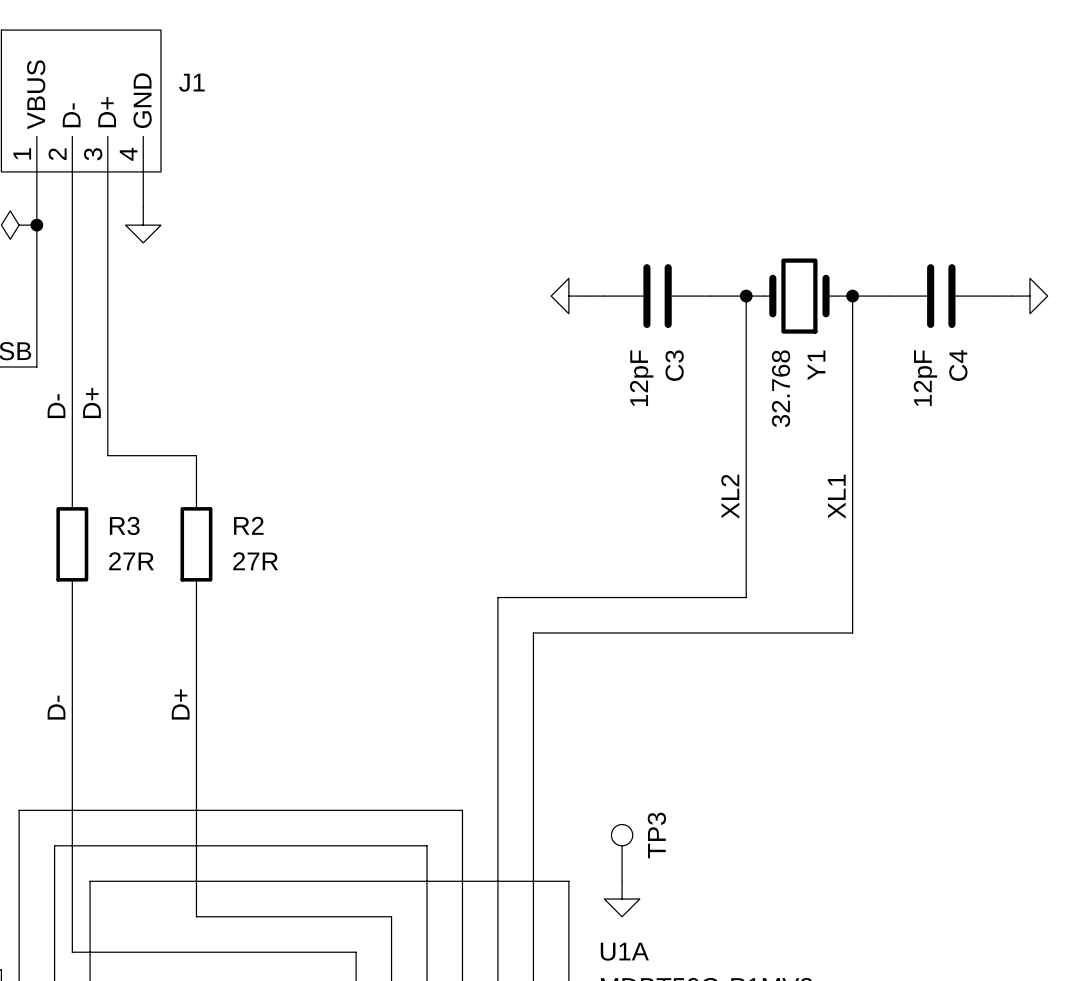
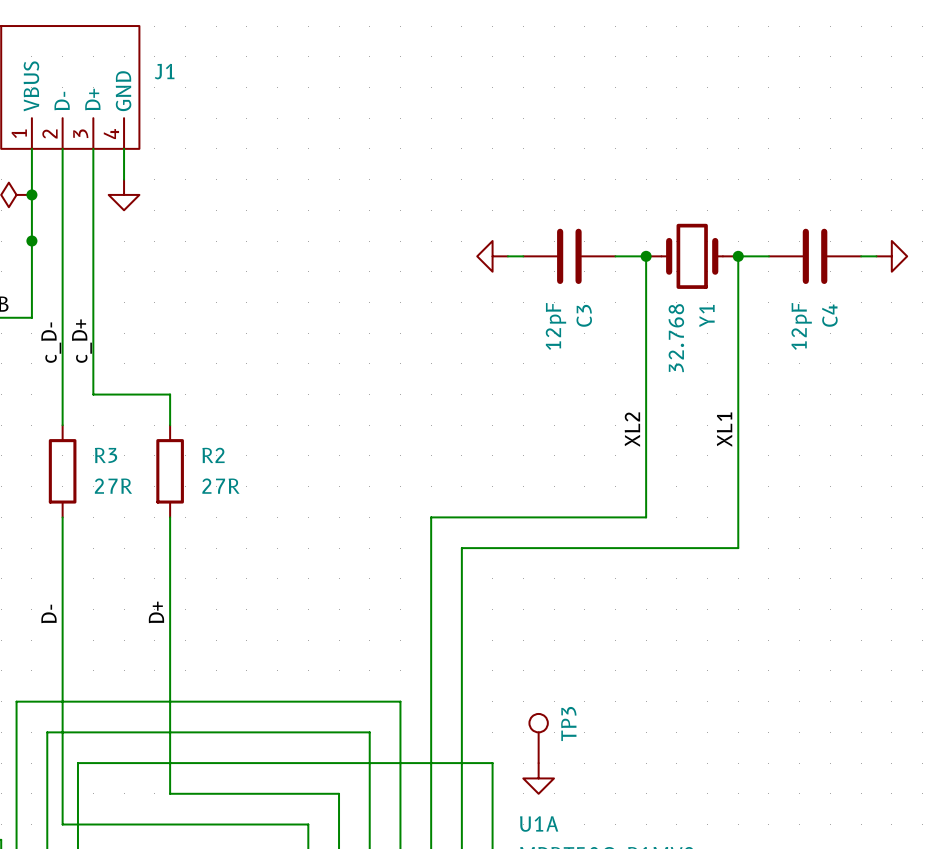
junction: none -> (31, 241)
label: D+ (91, 402) -> c_D+ (81, 341)
label: D- (56, 406) -> c_D- (51, 342)

